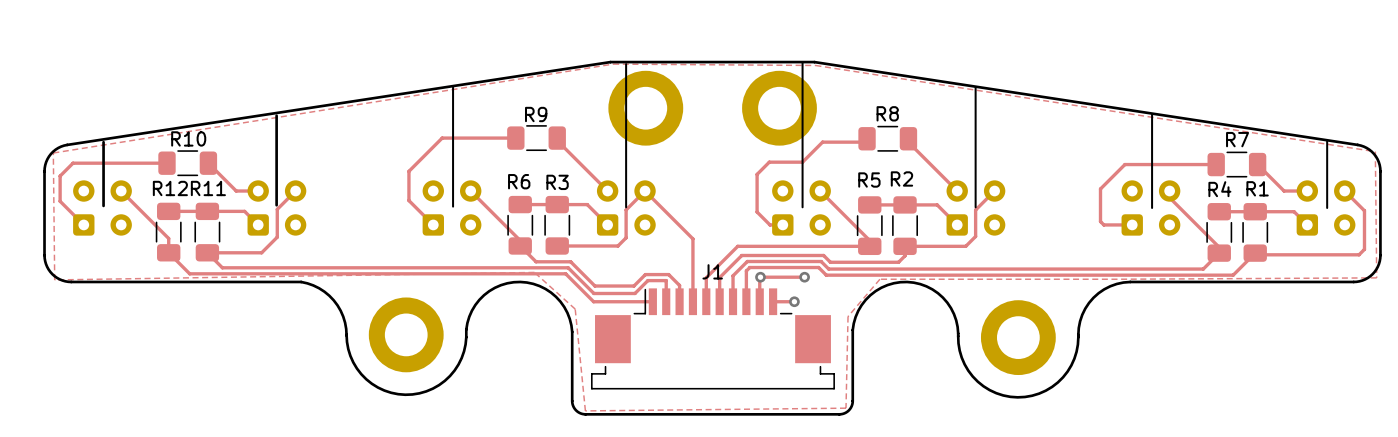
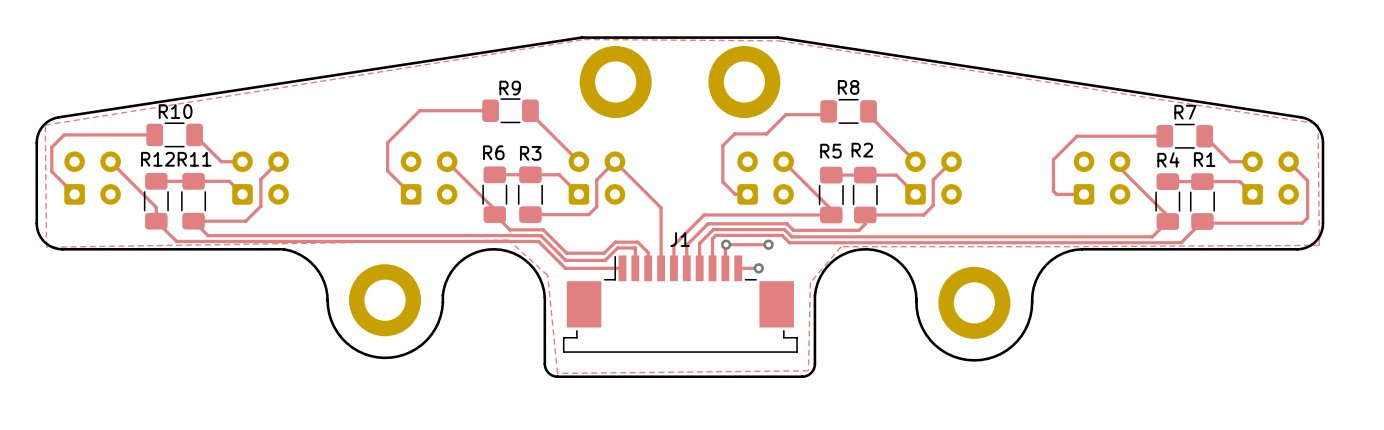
line: (802, 62) (802, 207) -> none
line: (626, 64) (626, 207) -> none
line: (453, 87) (453, 206) -> none
line: (975, 87) (975, 207) -> none
line: (1152, 114) (1152, 207) -> none
line: (276, 115) (276, 205) -> none
line: (1327, 140) (1327, 207) -> none
line: (103, 142) (103, 205) -> none

